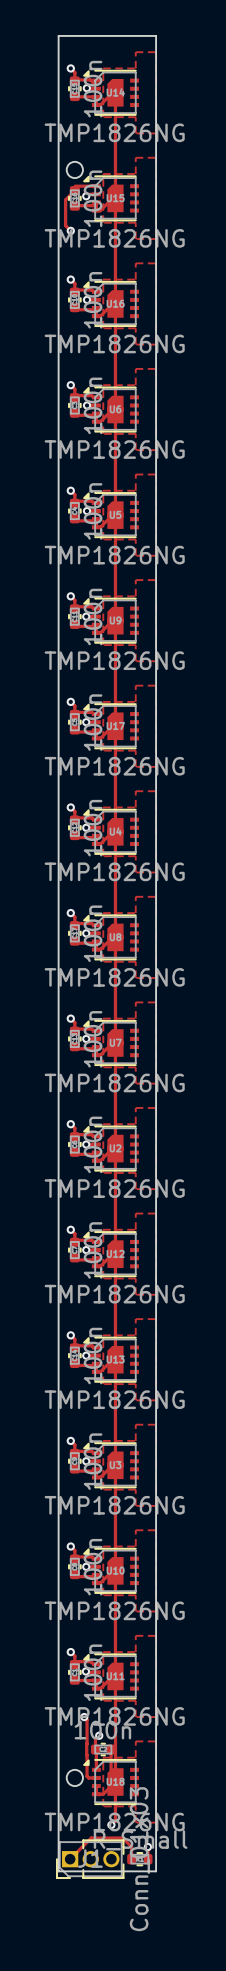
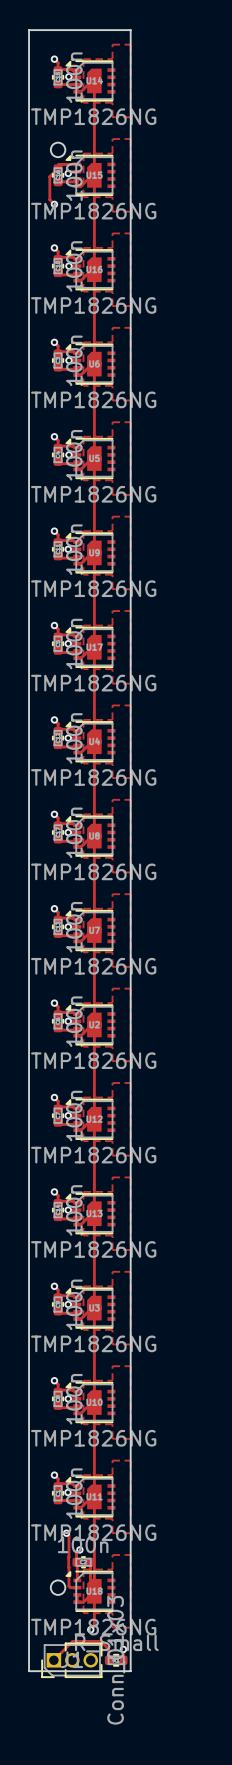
board edge: (58, 35) (58, 1871) -> (43, 30) (29, 30) (29, 1671) (43, 1671)

